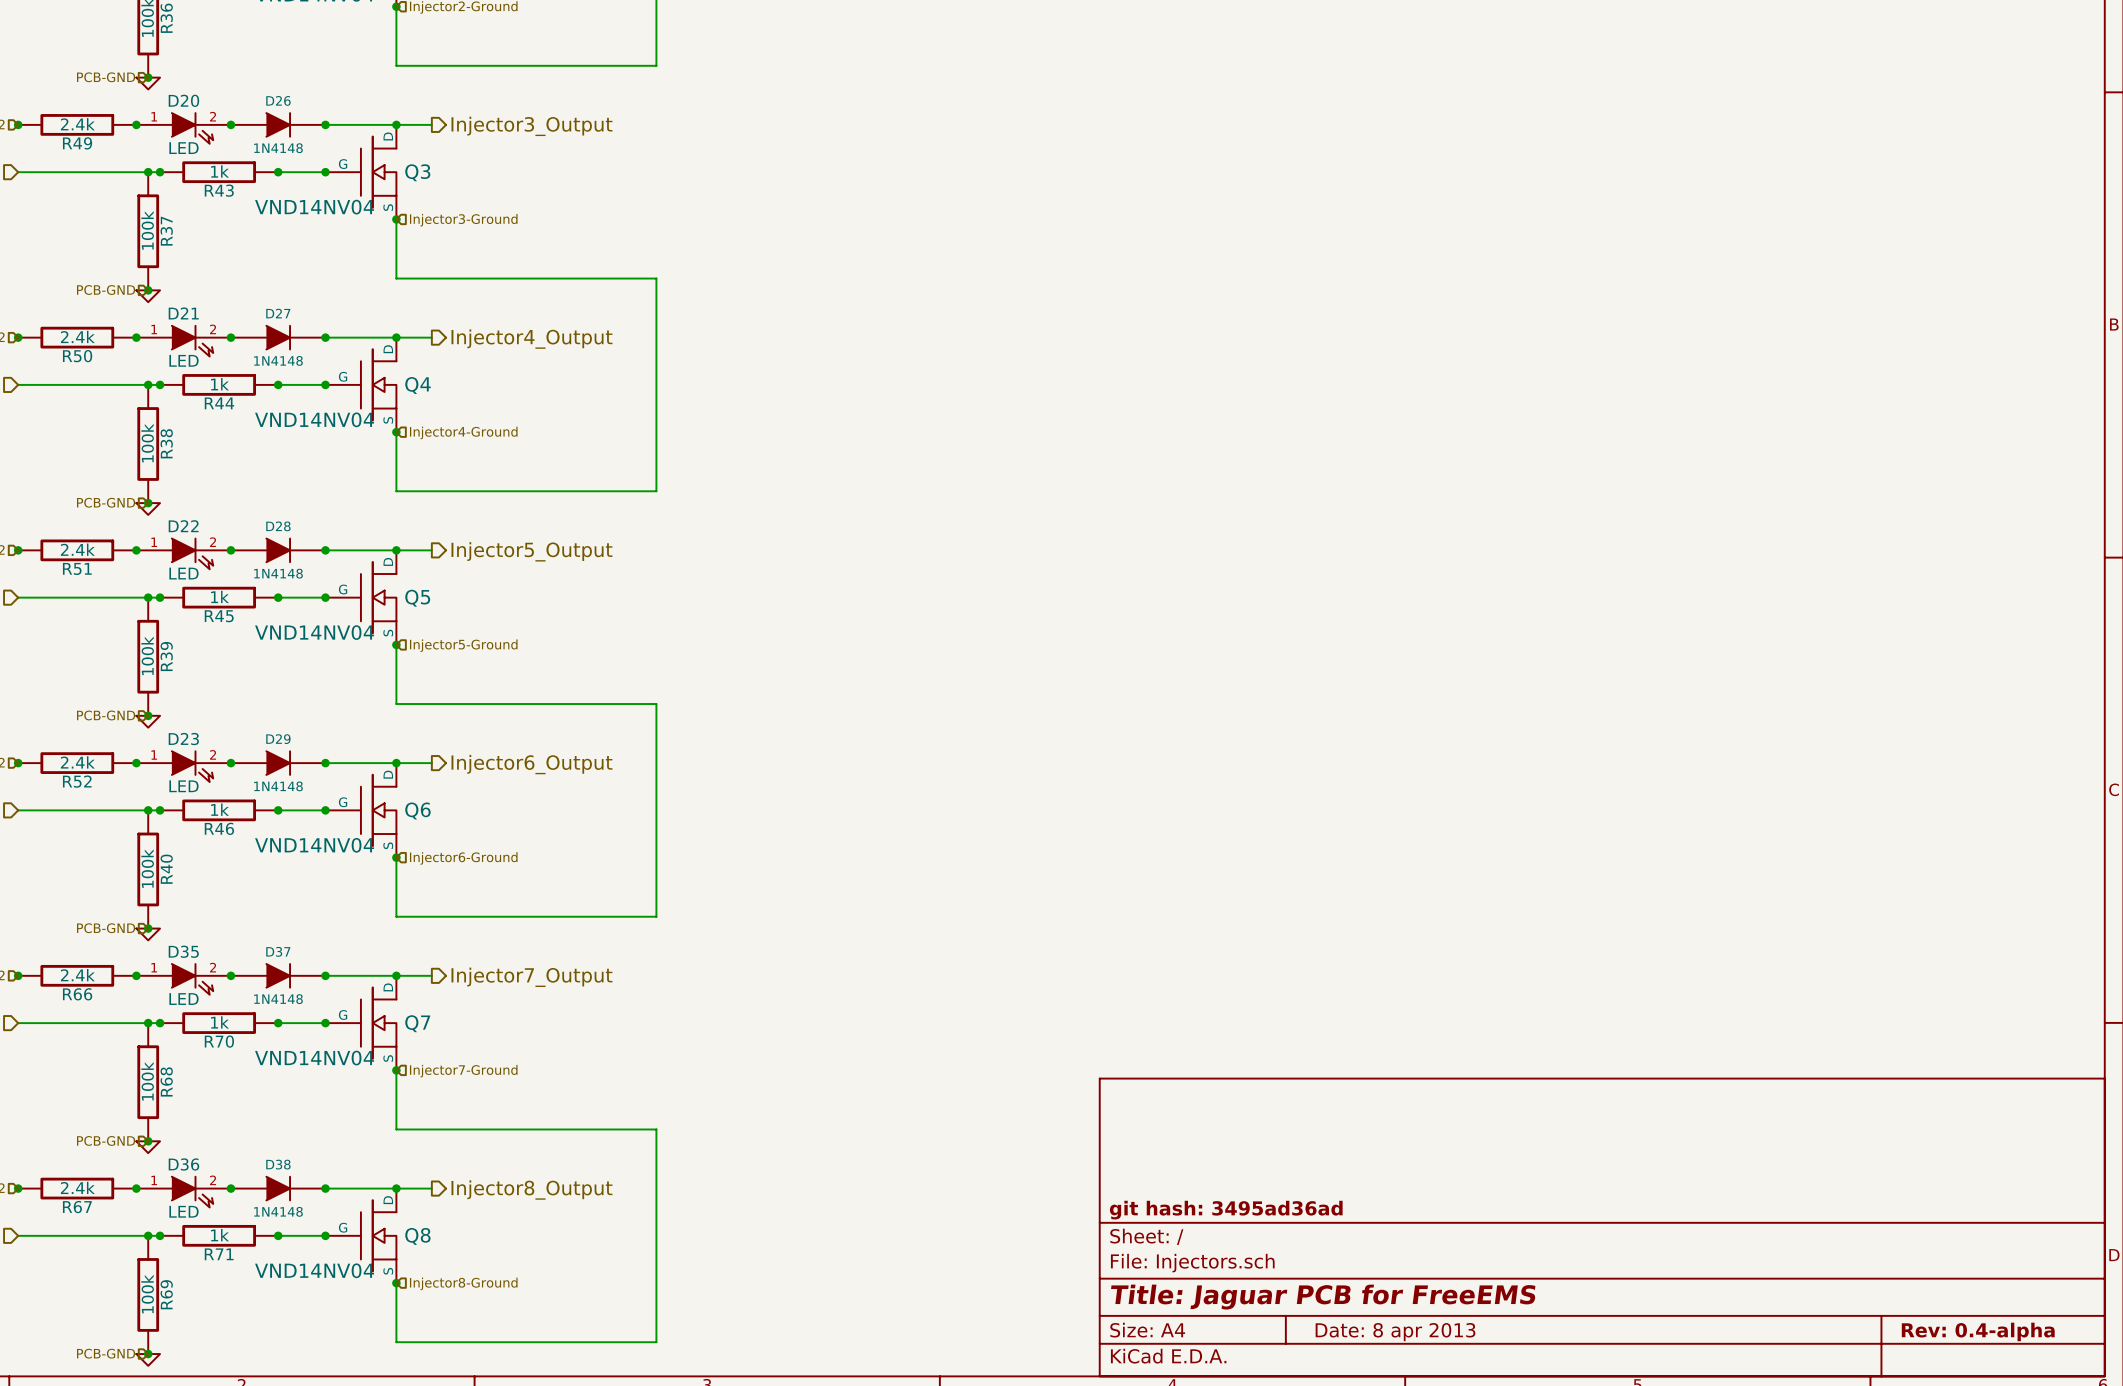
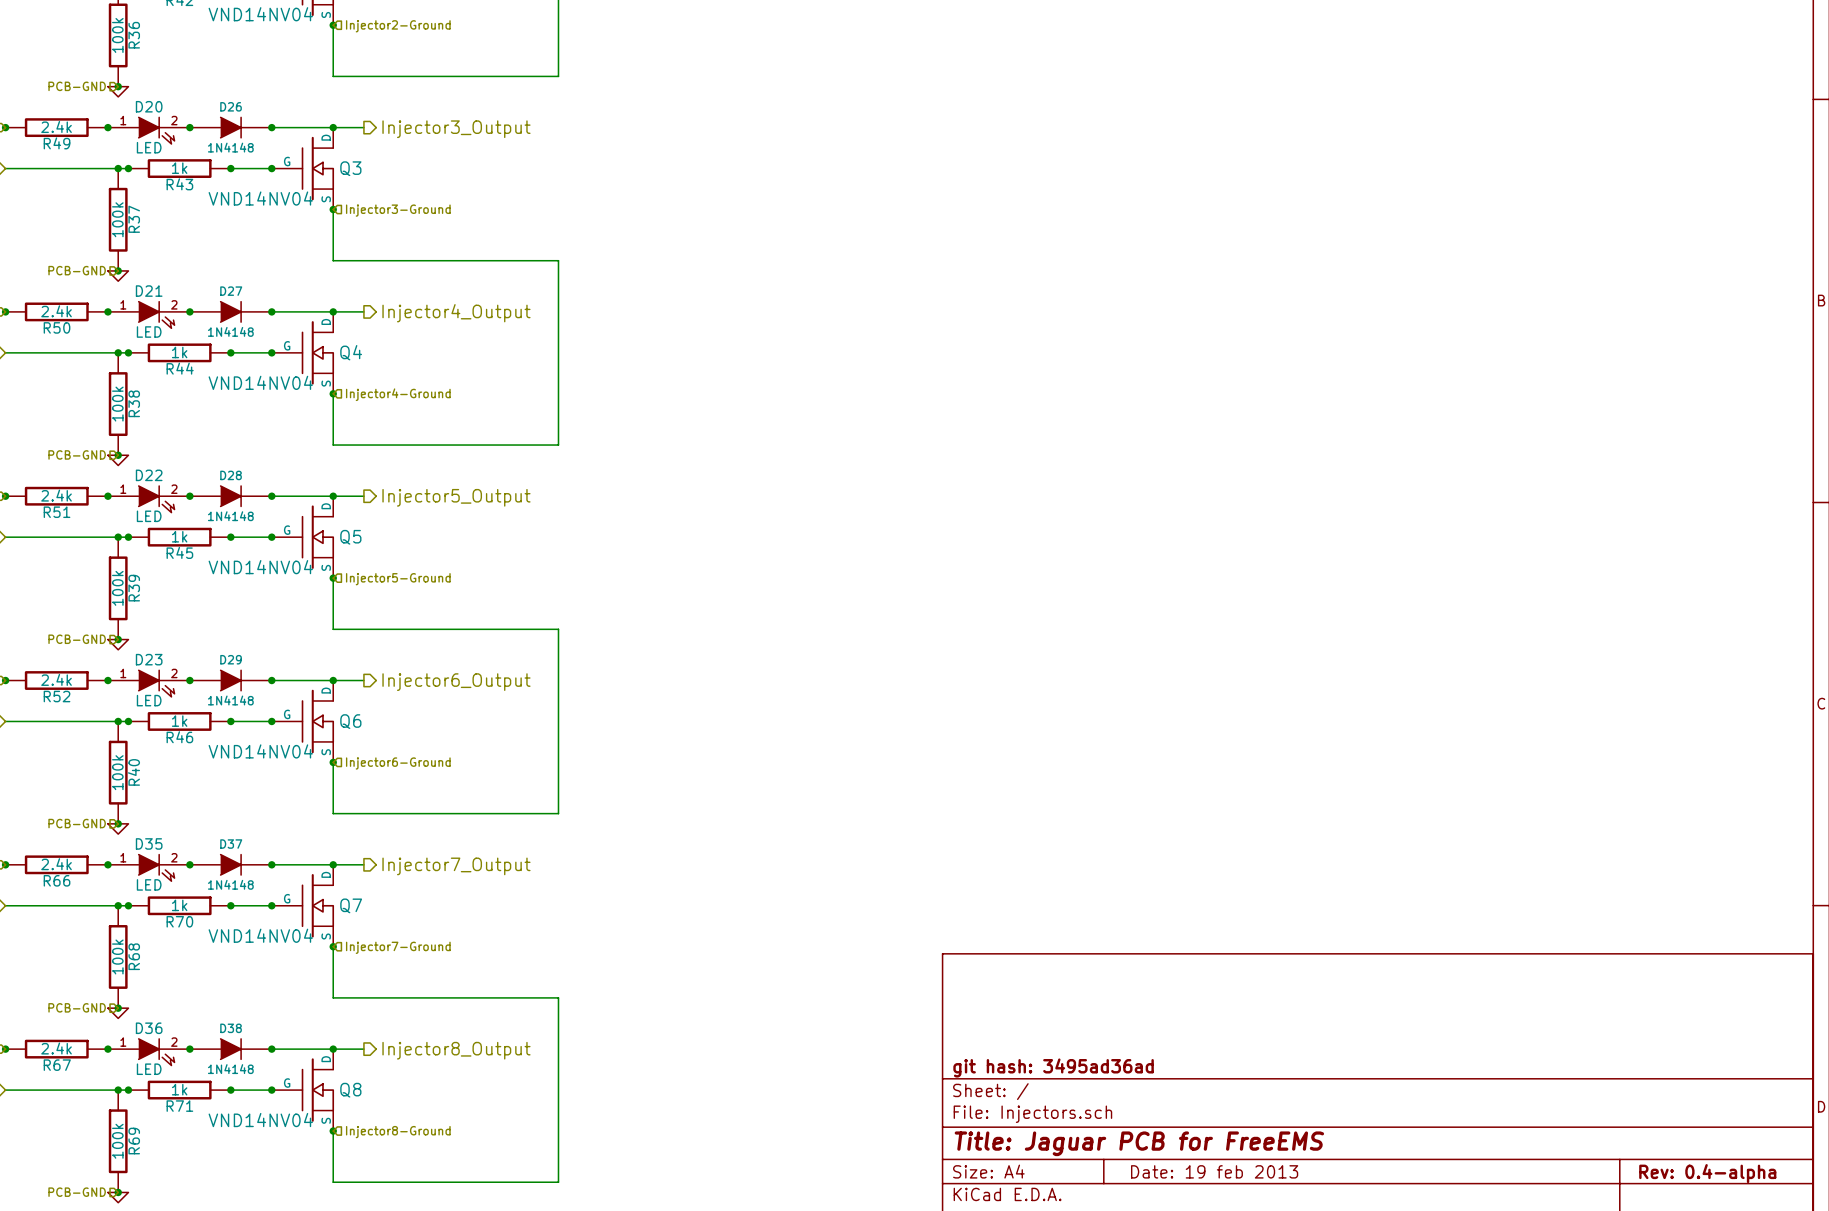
title block: Date: 8 apr 2013 (1395, 1332) -> Date: 19 feb 2013 (1214, 1171)

